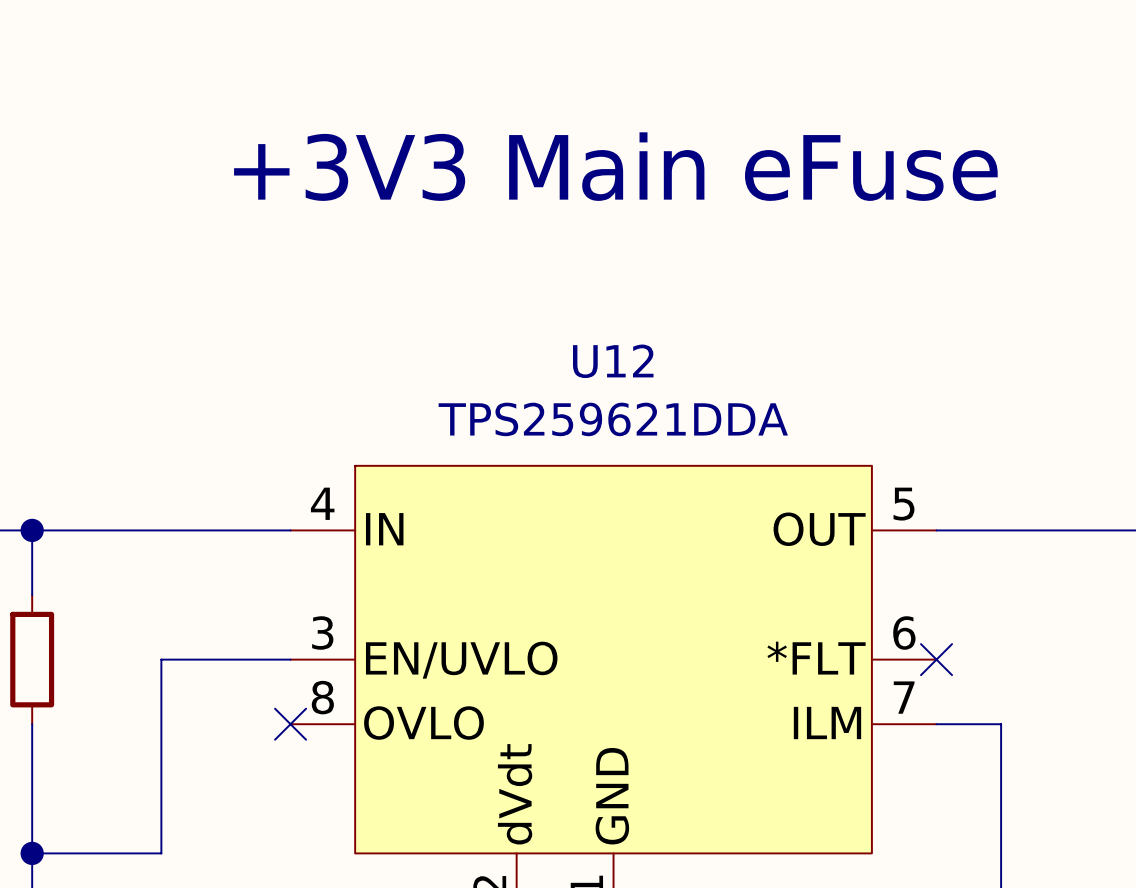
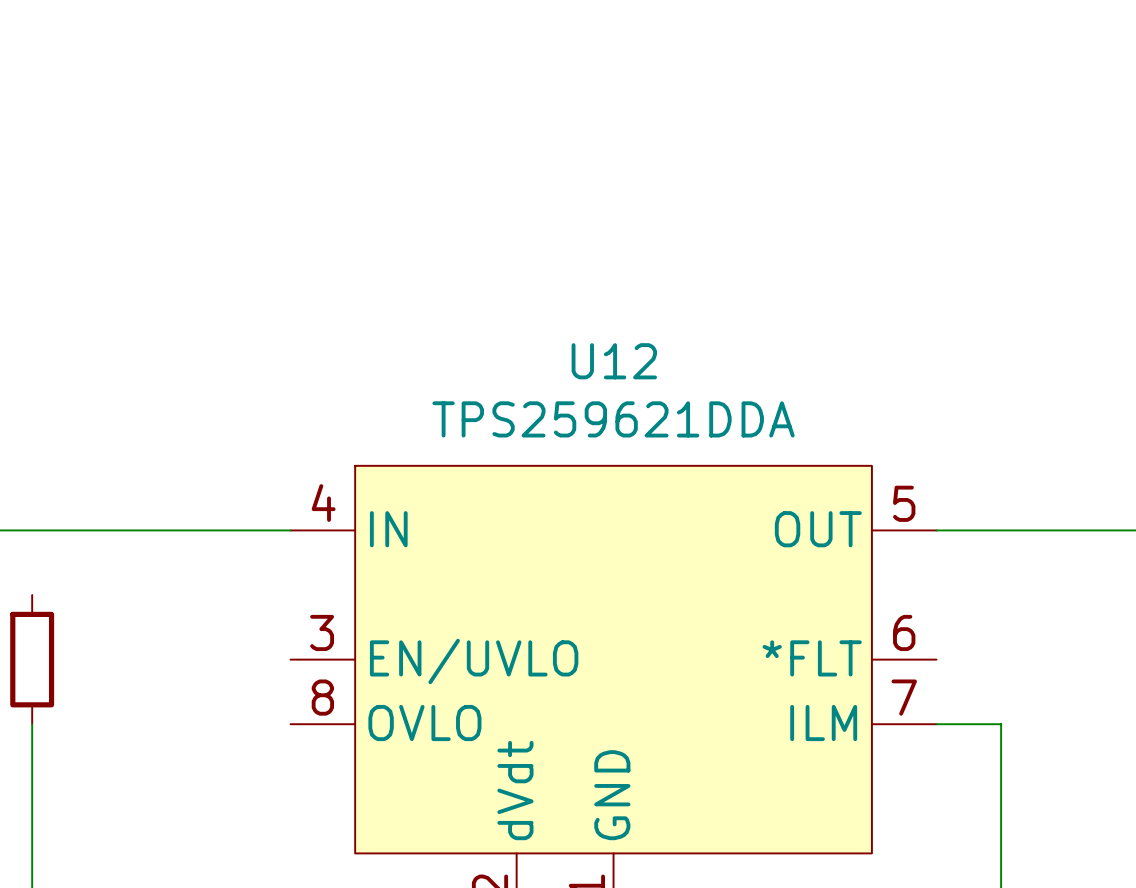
text: +3V3 Main eFuse (615, 166) -> none
wire: (32, 530) (32, 595) -> none
junction: (32, 530) -> none
wire: (290, 659) (161, 659) (161, 853) (32, 853) -> none
no-connect mark: (936, 659) -> none
no-connect mark: (290, 724) -> none
junction: (32, 853) -> none

